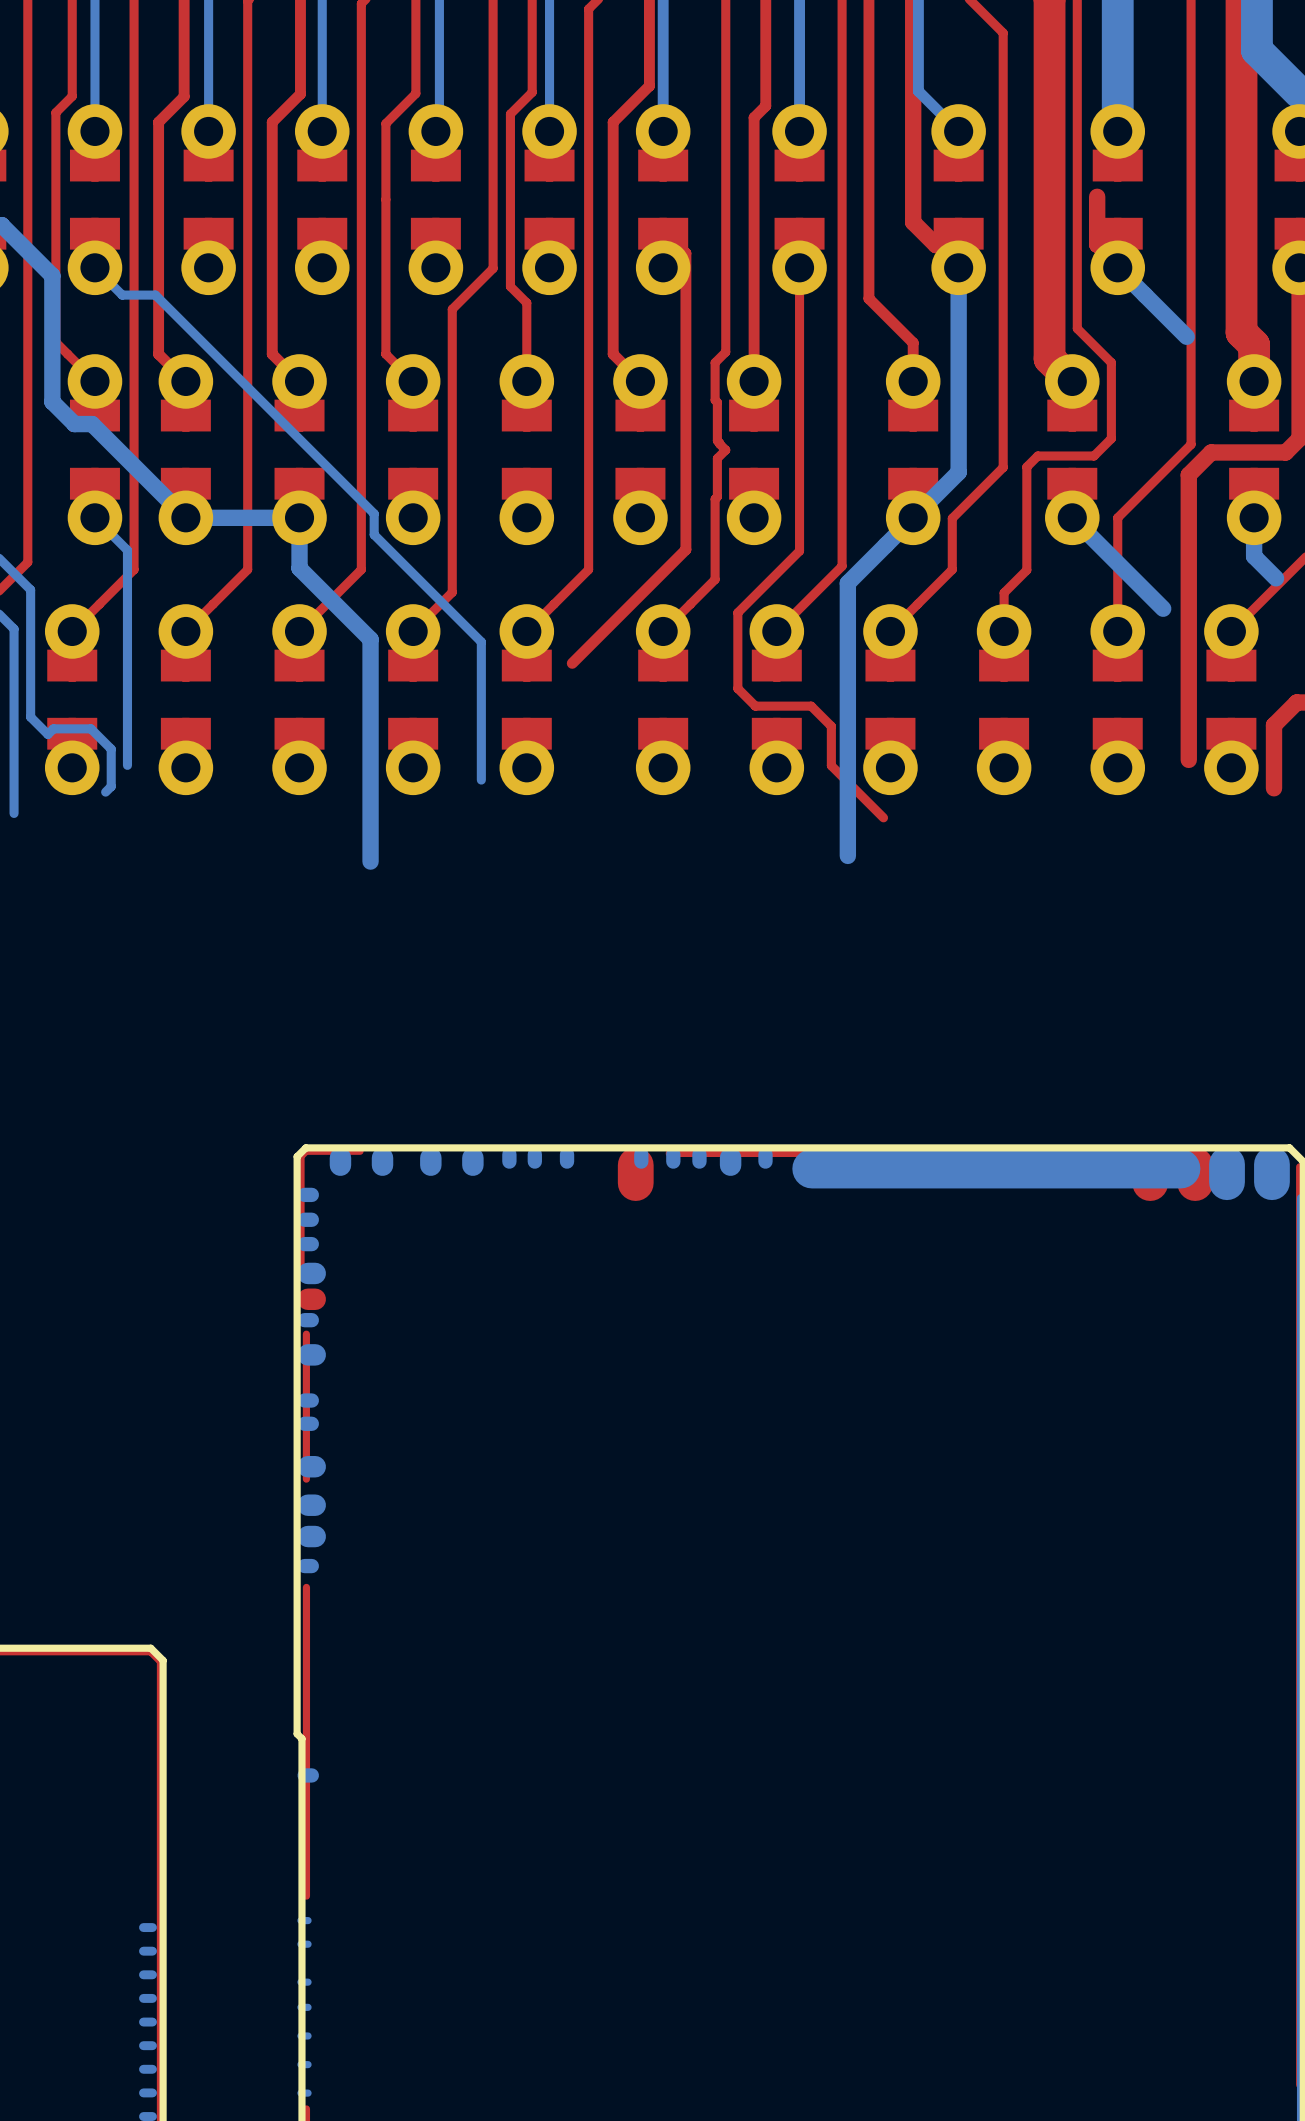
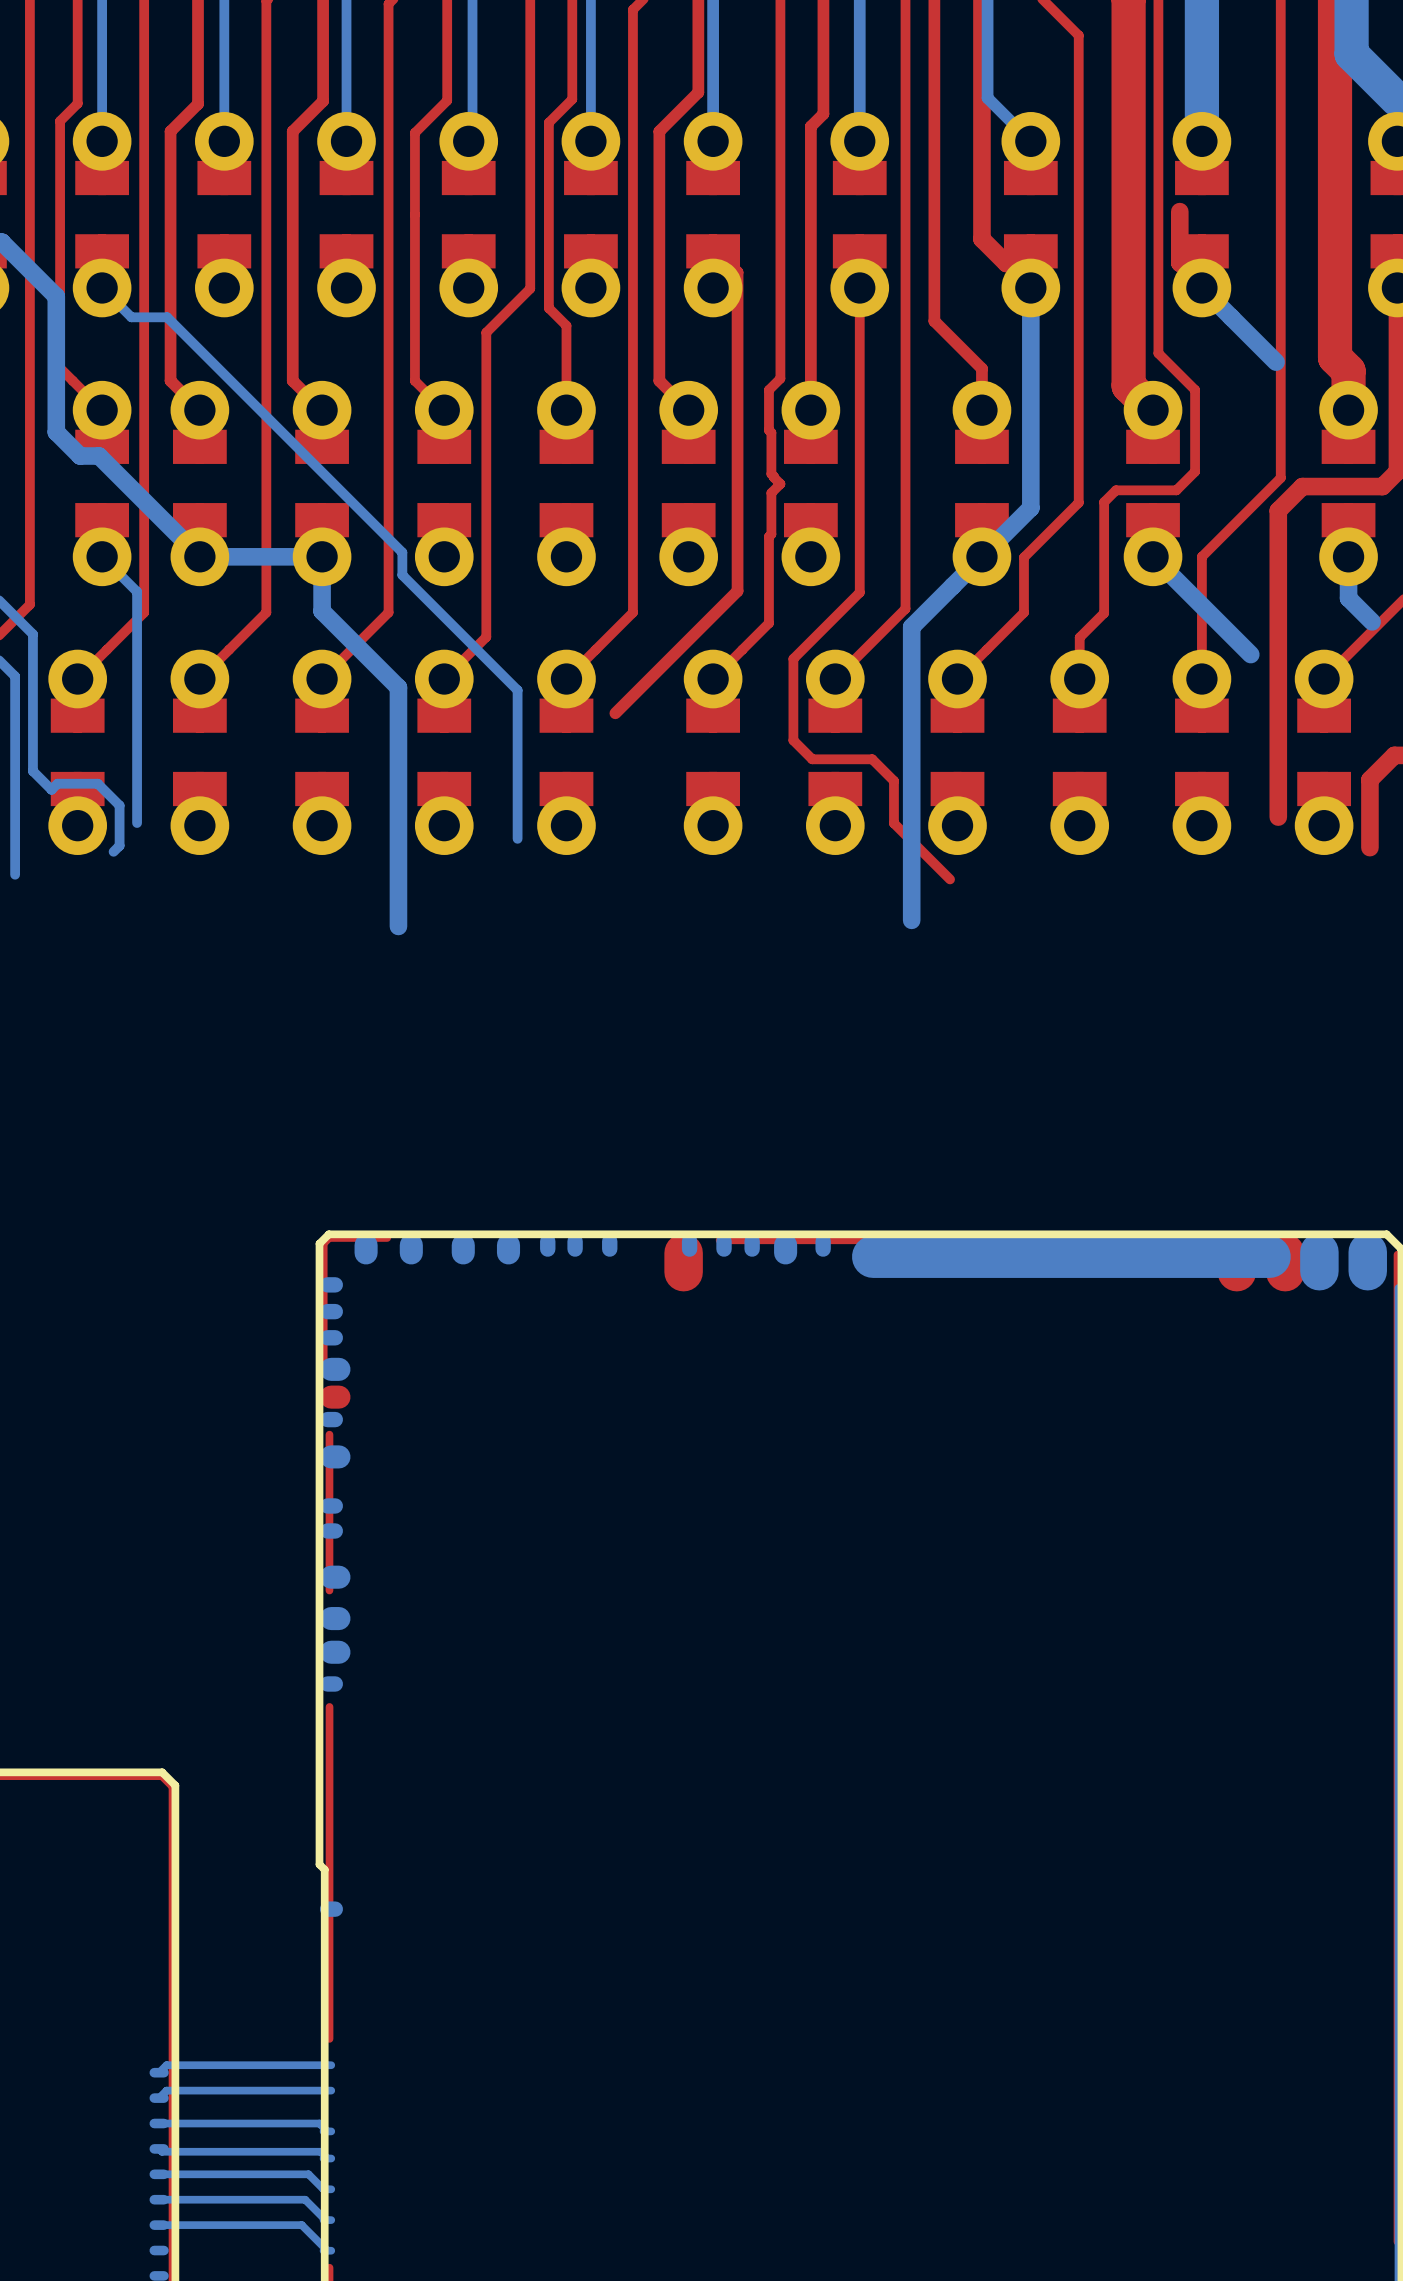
bottom track: none -> (327, 2065) (166, 2065) (159, 2072)
bottom track: none -> (327, 2090) (166, 2090) (159, 2098)
bottom track: none -> (159, 2123) (319, 2123) (327, 2131)
bottom track: none -> (159, 2148) (161, 2151) (320, 2151) (327, 2158)
bottom track: none -> (159, 2174) (308, 2174) (323, 2189) (327, 2189)
bottom track: none -> (159, 2199) (305, 2199) (327, 2220)
bottom track: none -> (159, 2225) (301, 2225) (327, 2250)

